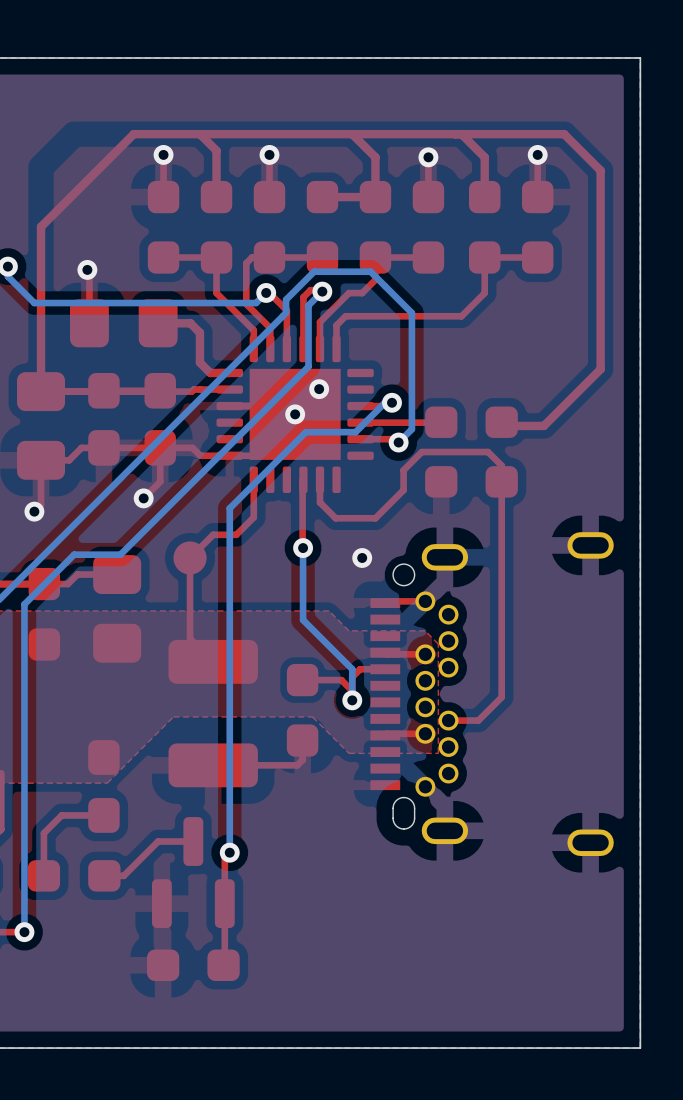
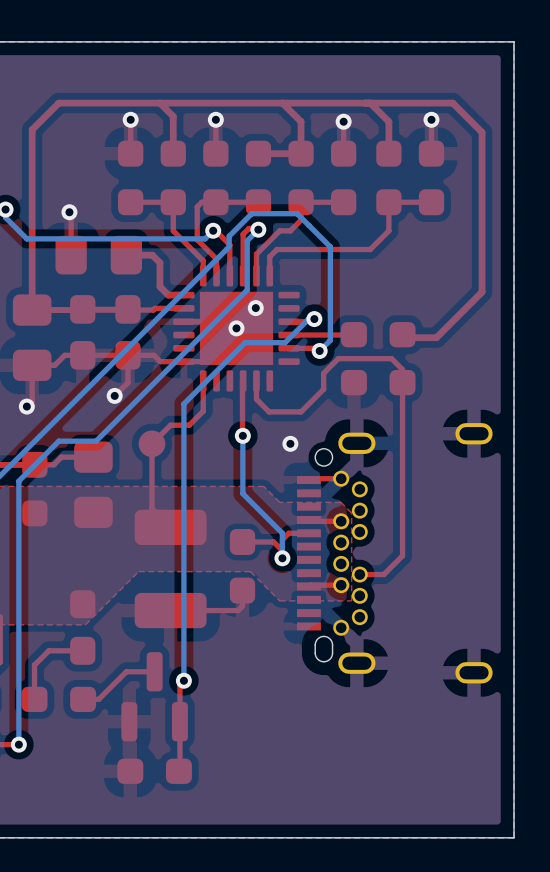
top track: (133, 134) (41, 226) -> (106, 103) (58, 103) (32, 129) (32, 177)

